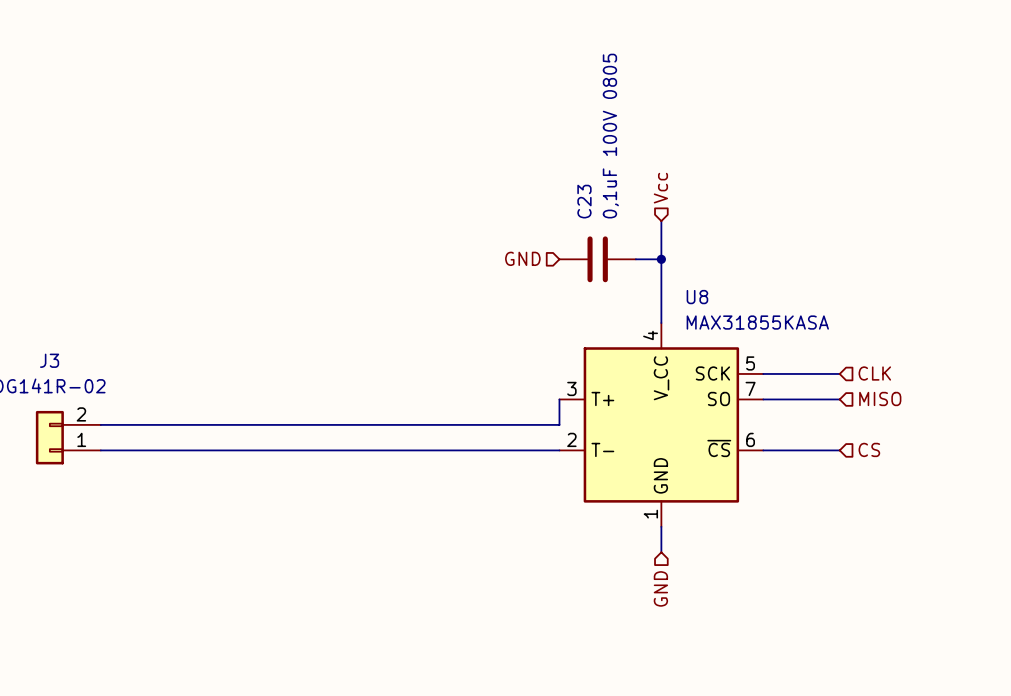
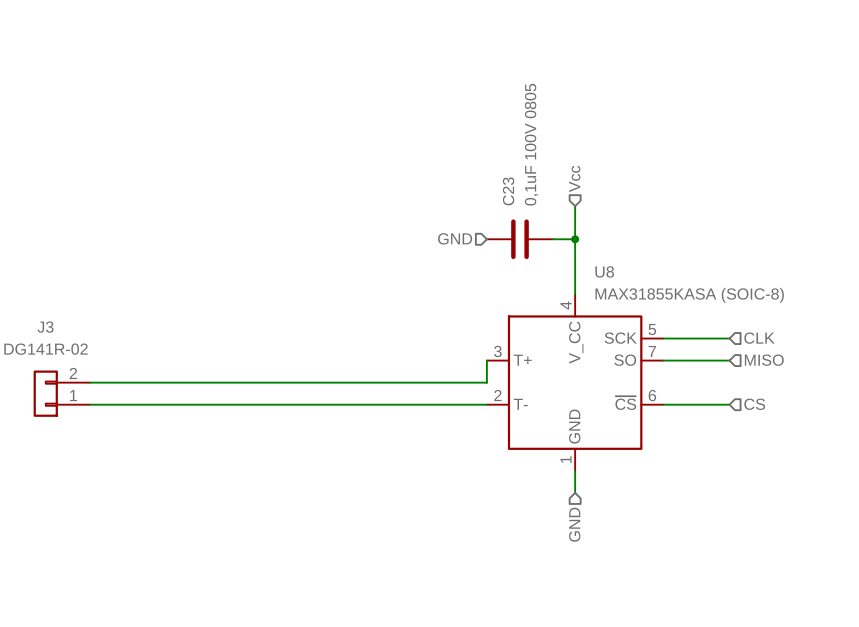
U8 value: MAX31855KASA (757, 322) -> MAX31855KASA (SOIC-8) (689, 295)

